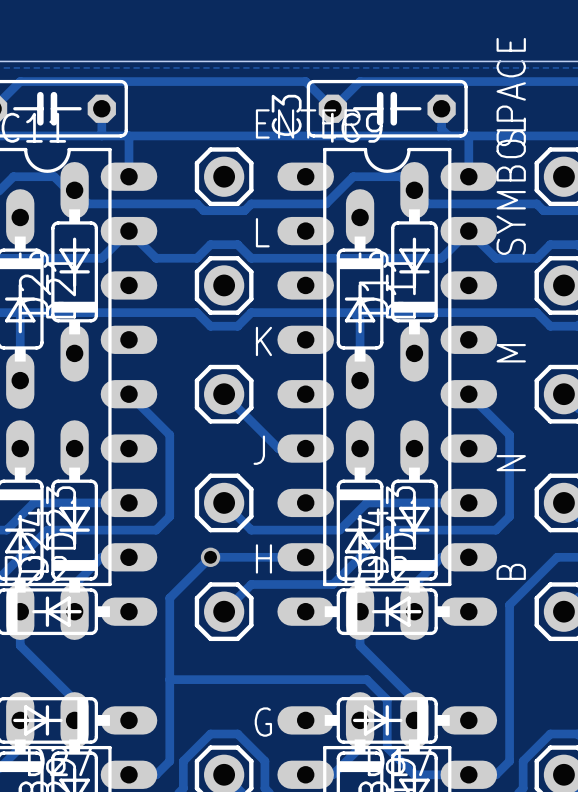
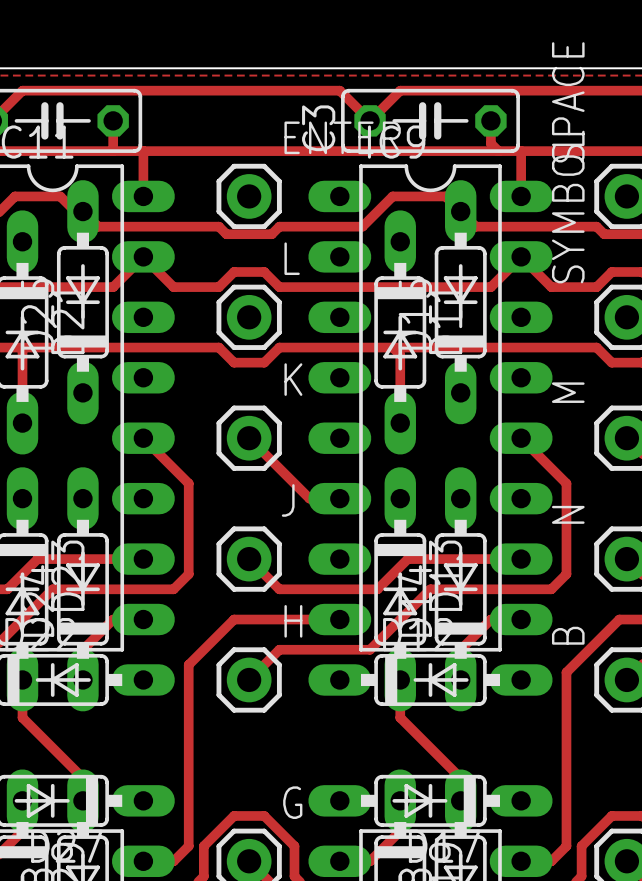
via: (210, 557) -> none
track: (169, 679) (366, 679) (387, 700) (387, 747) (414, 774) (468, 774) -> none

